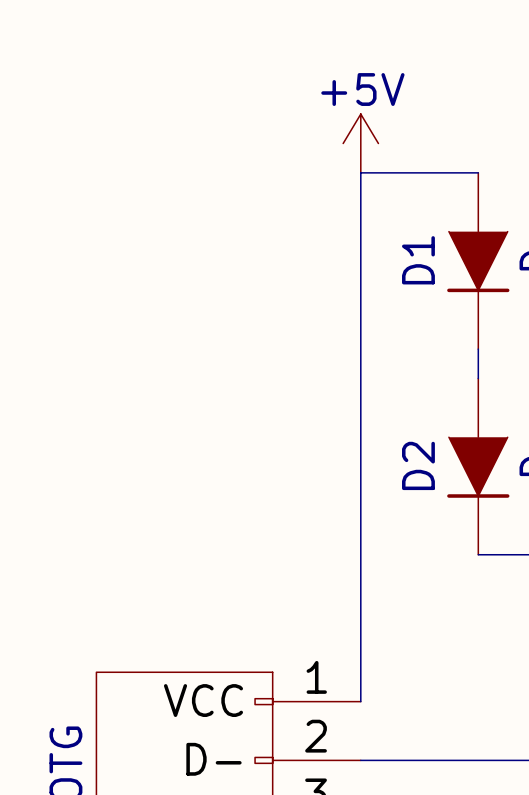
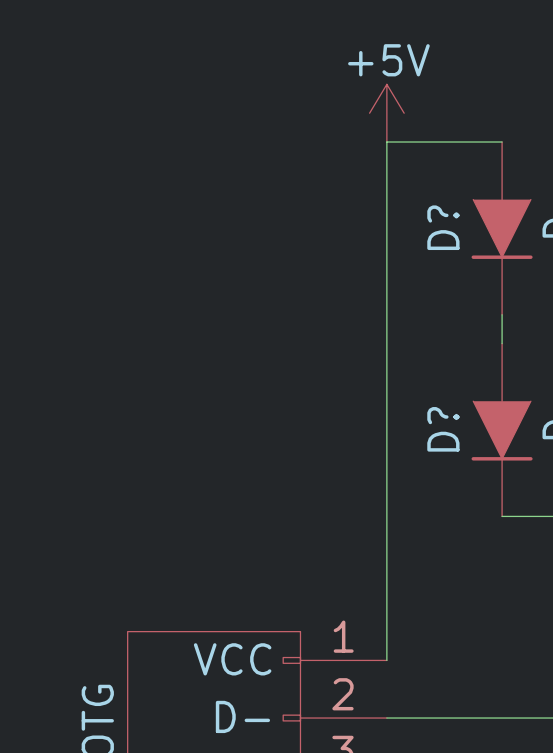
D1 name: D1 (418, 260) -> D? (443, 227)
D2 name: D2 (418, 465) -> D? (443, 429)

